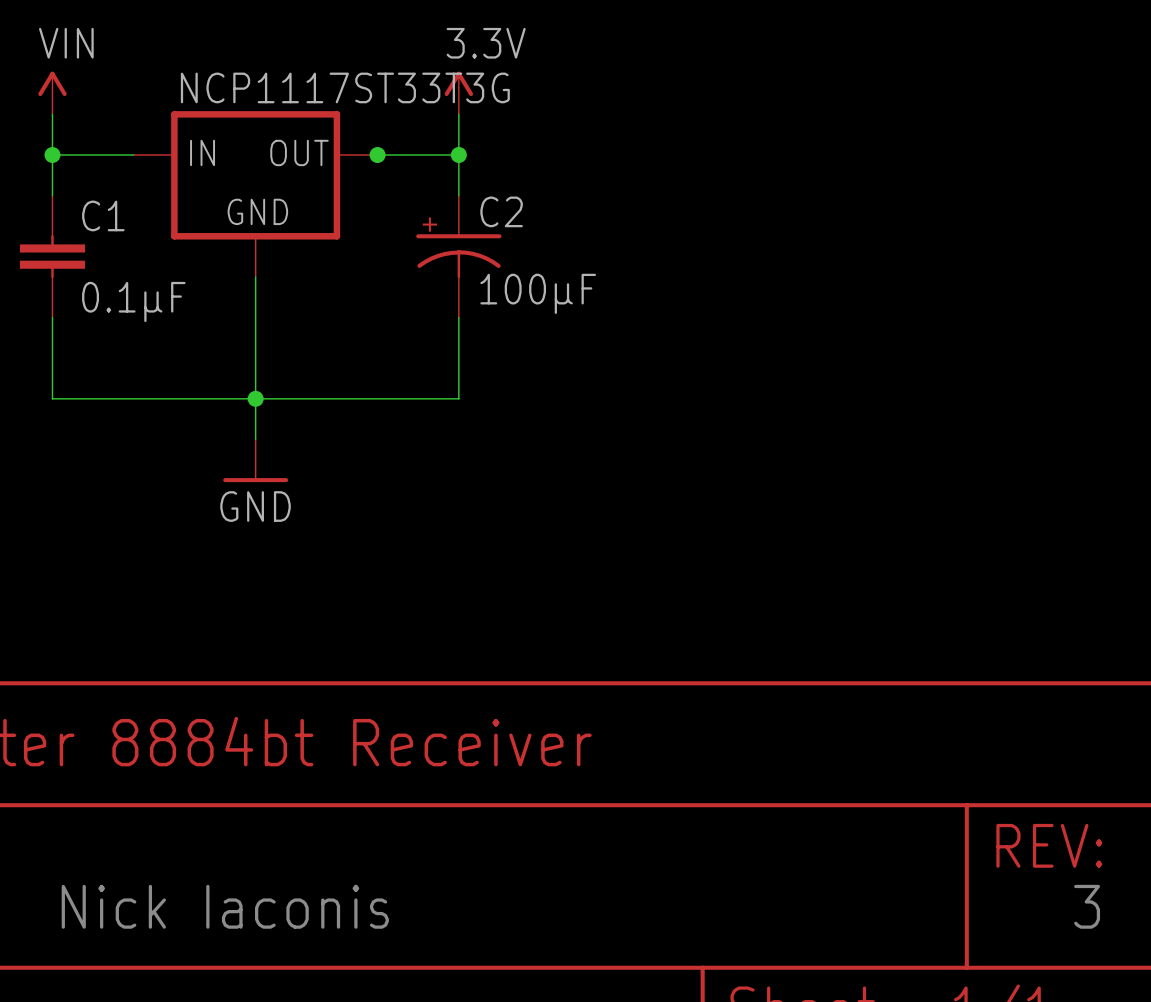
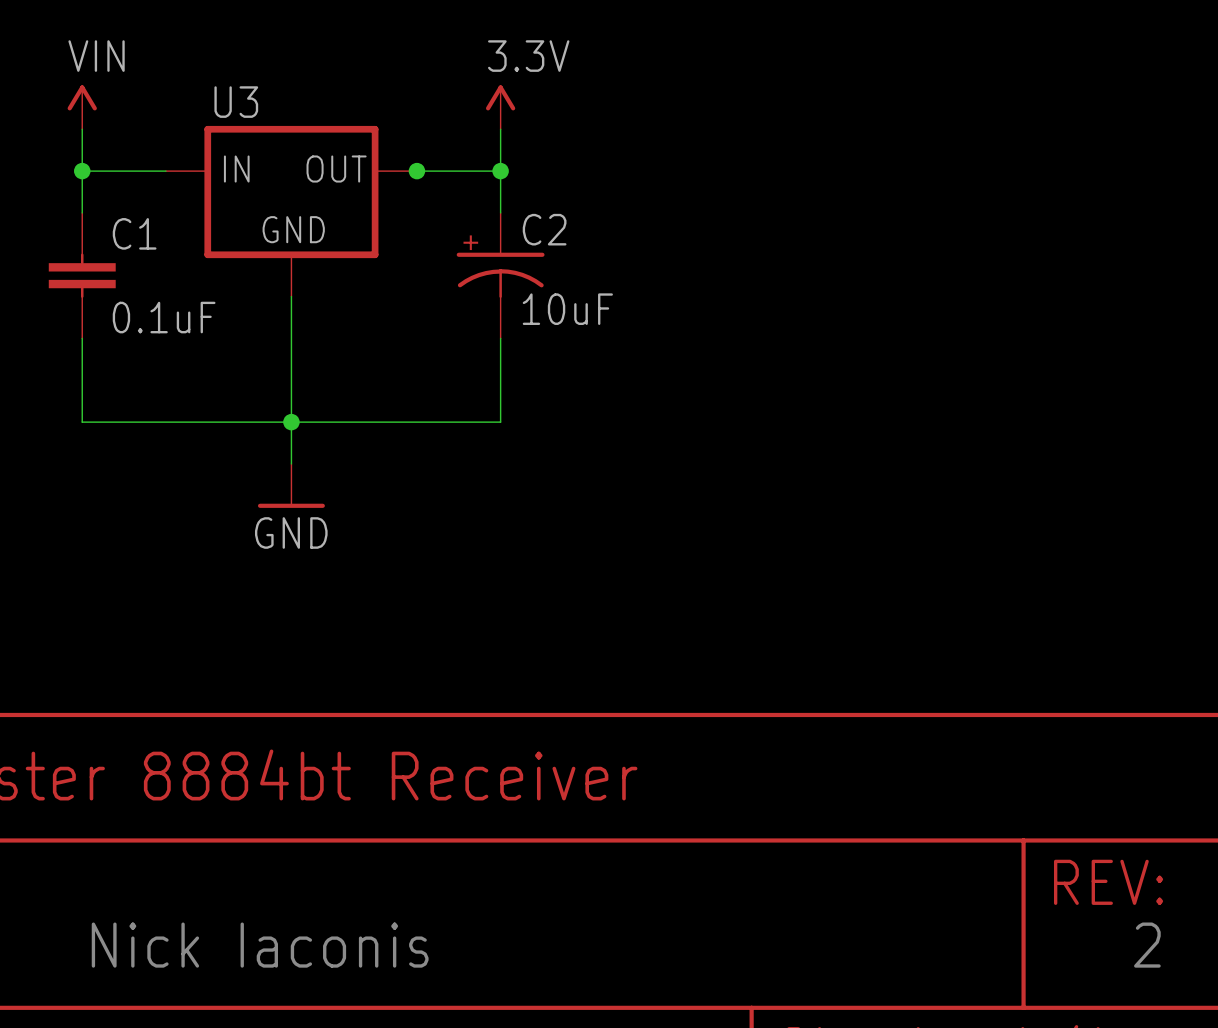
NCP1117ST33T3G name: NCP1117ST33T3G (345, 87) -> U3 (236, 102)
C2 value: 100µF (538, 293) -> 10uF (567, 309)
C1 value: 0.1µF (133, 301) -> 0.1uF (164, 317)
text: 3 (1087, 906) -> 2 (1147, 945)

